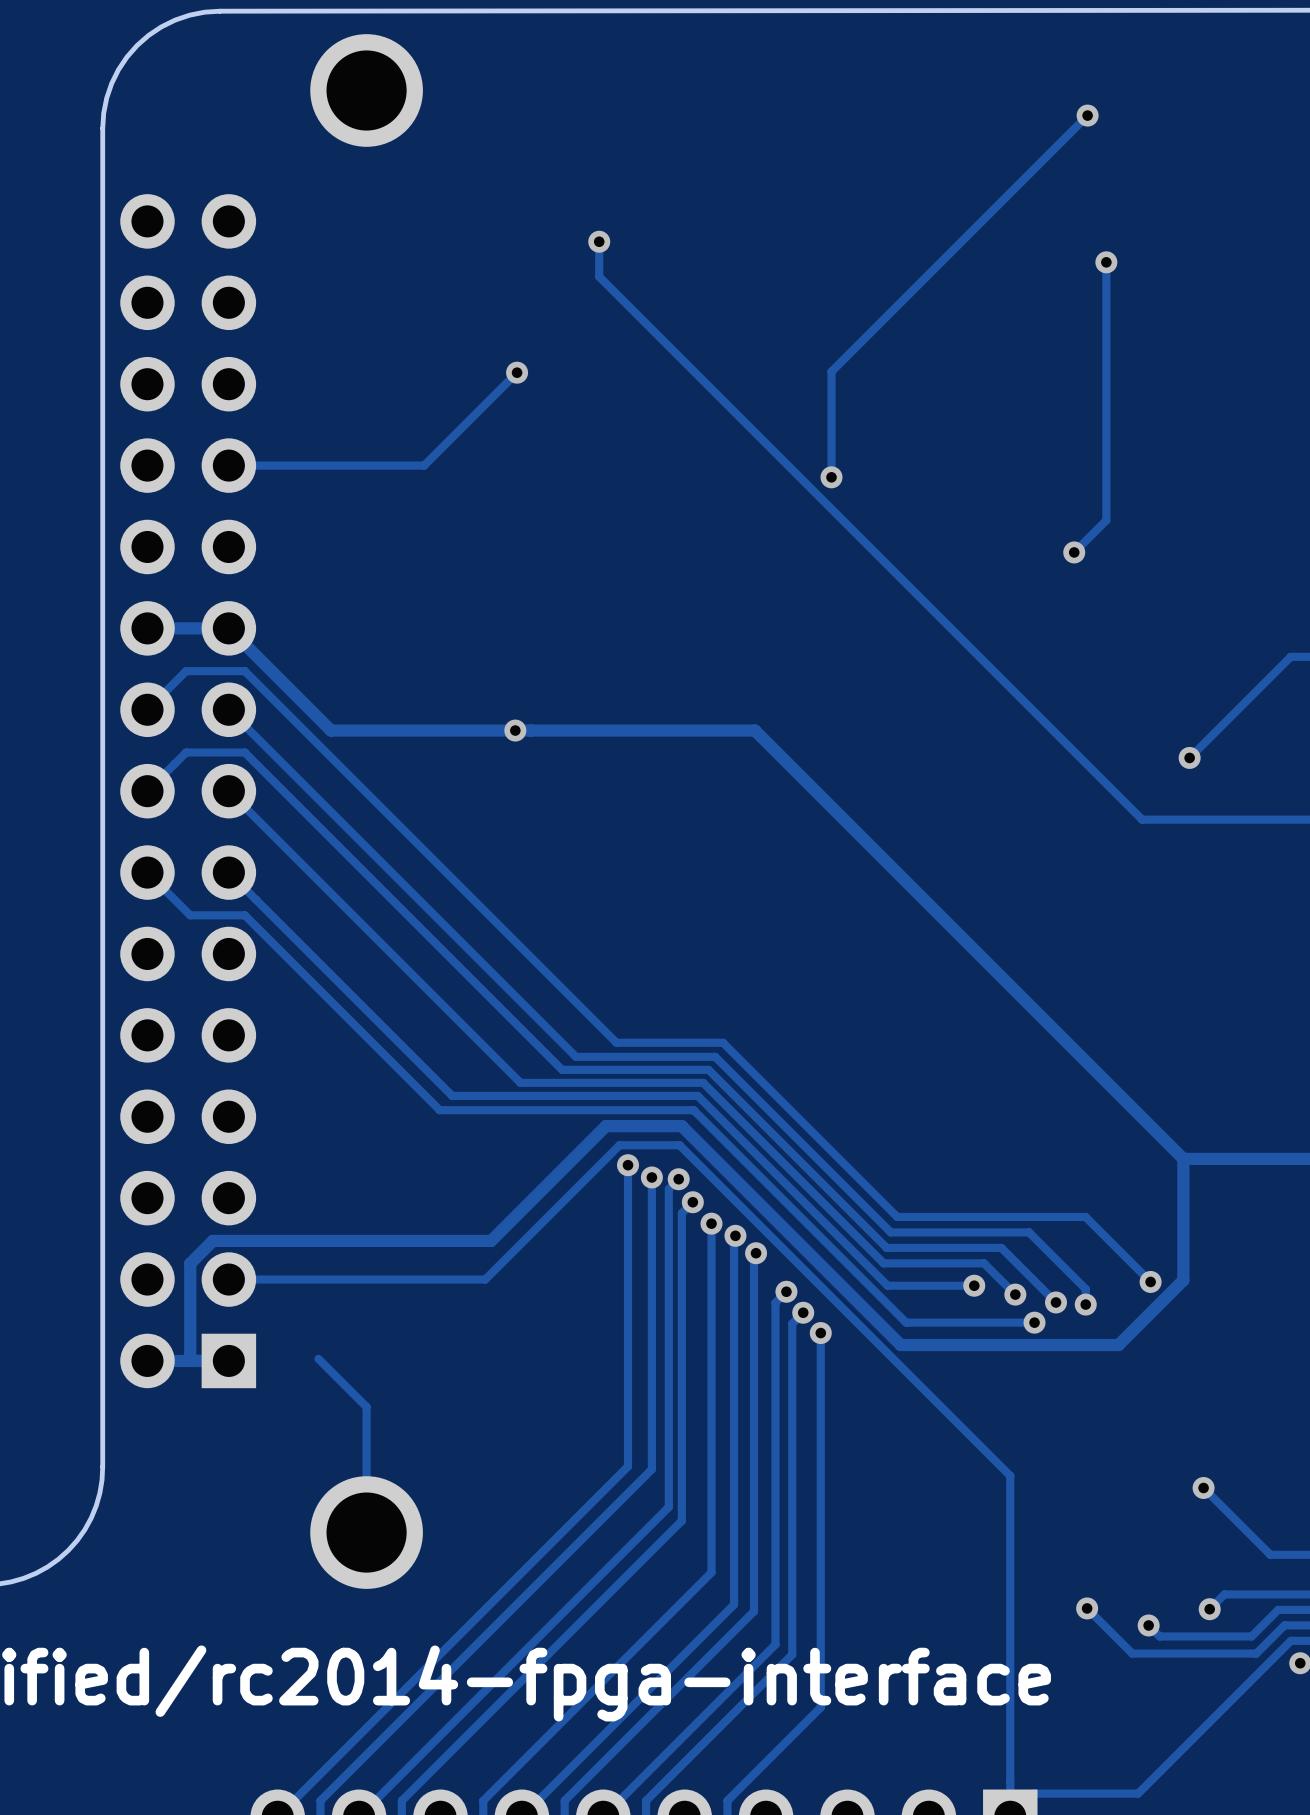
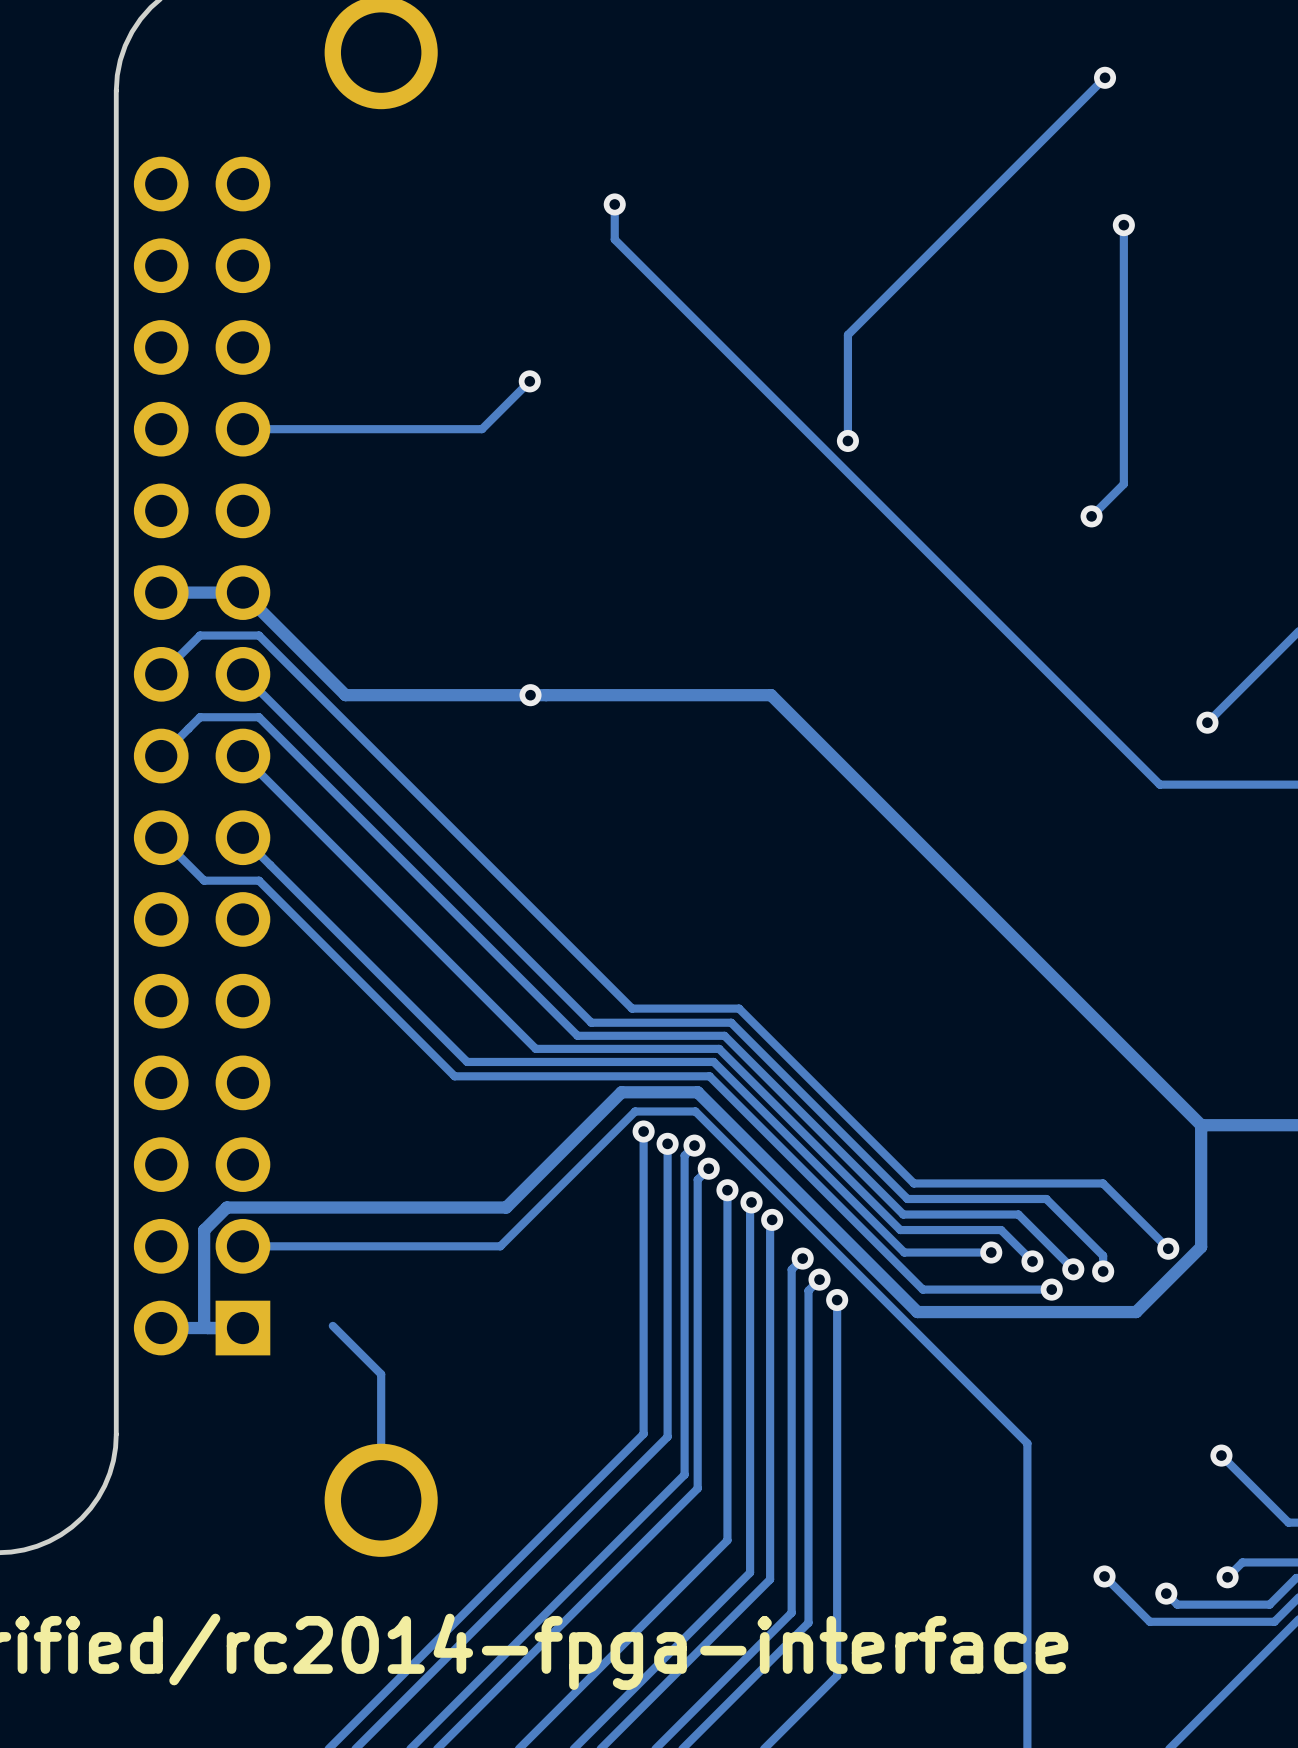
track: (517, 372) (424, 465) -> (529, 381) (481, 429) (439, 429)
via position: (517, 372) -> (529, 381)

